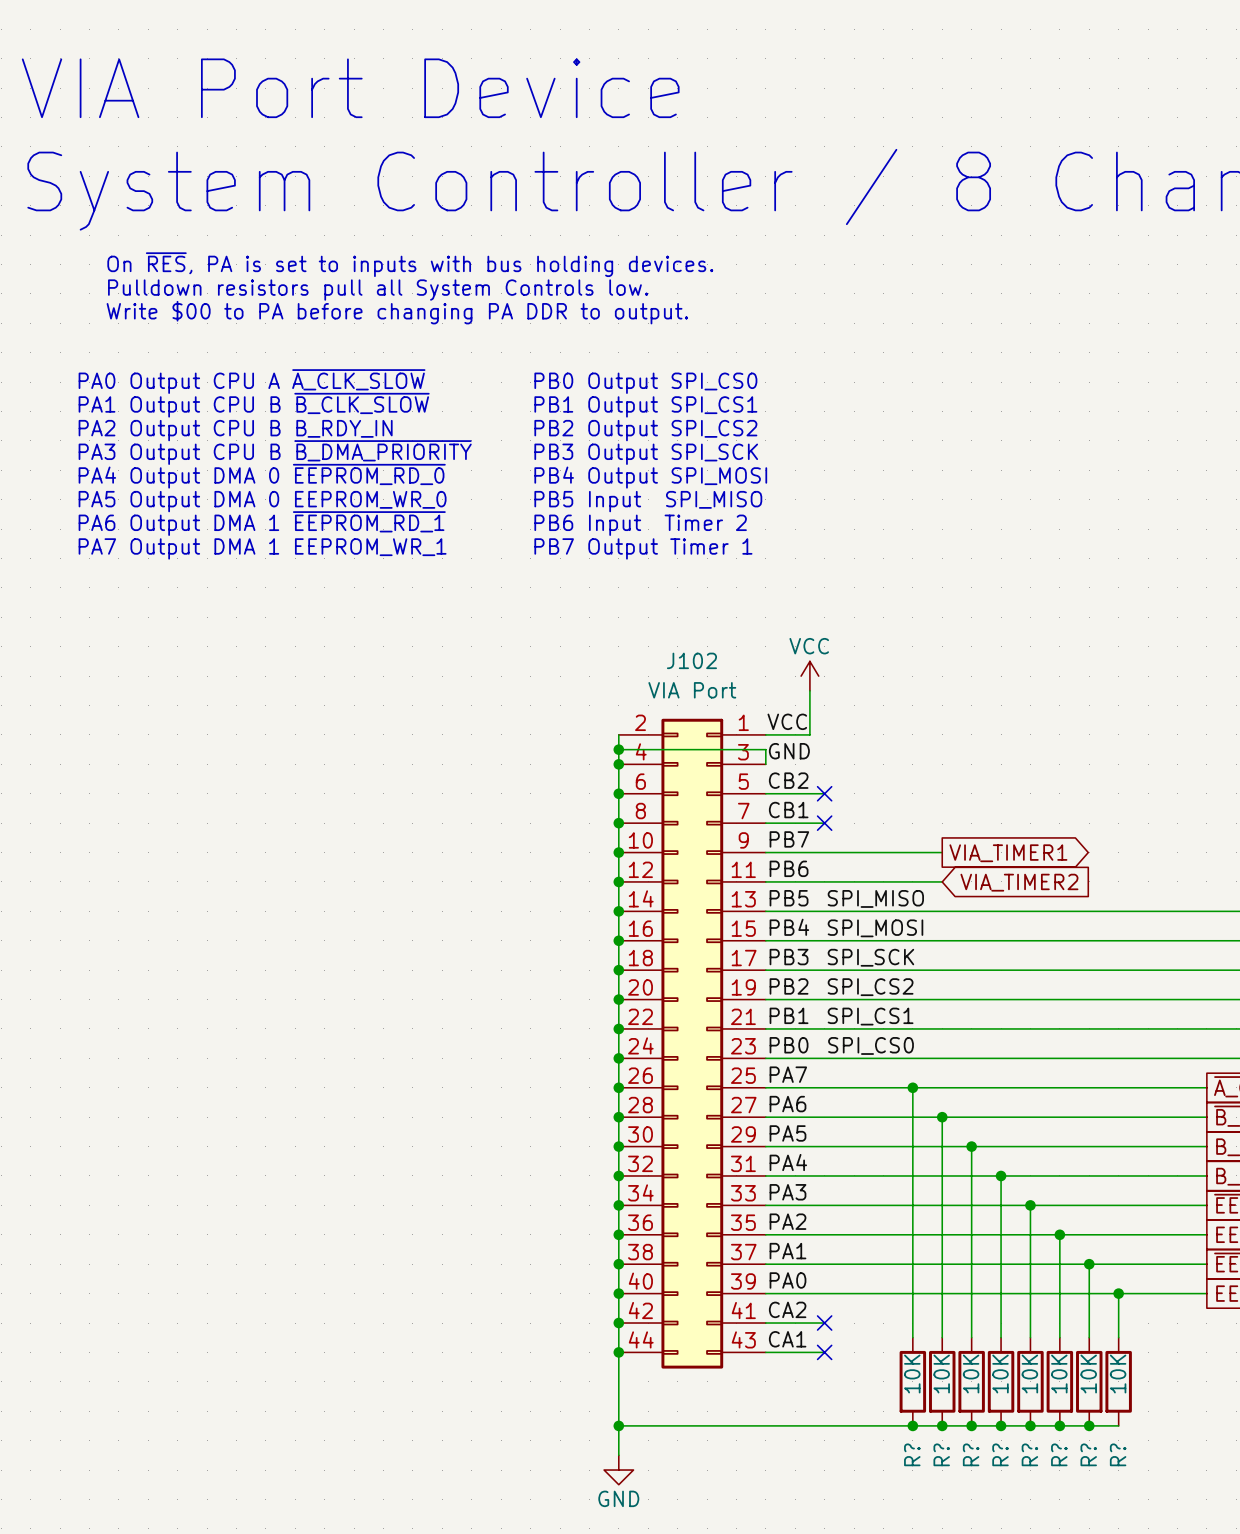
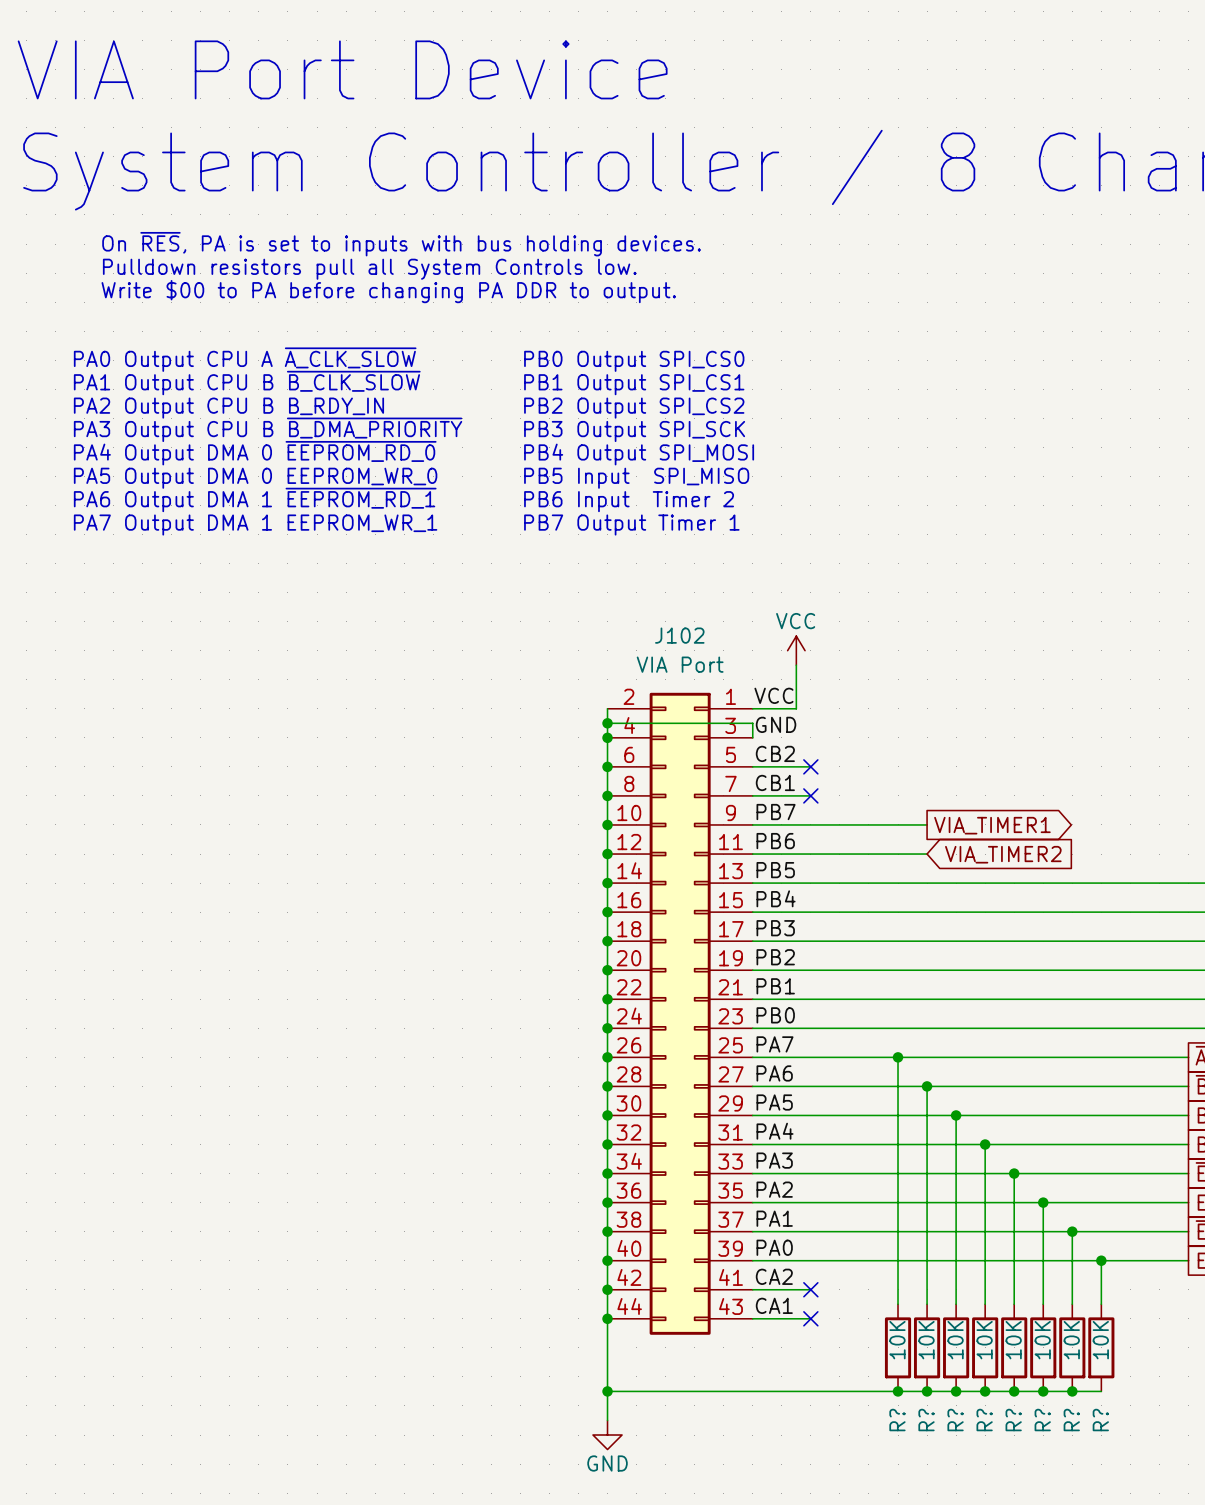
label: SPI_MISO (875, 898) -> none
label: SPI_MOSI (875, 928) -> none
label: SPI_SCK (870, 957) -> none
label: SPI_CS2 (870, 987) -> none
label: SPI_CS1 (870, 1016) -> none
label: SPI_CS0 (871, 1045) -> none

